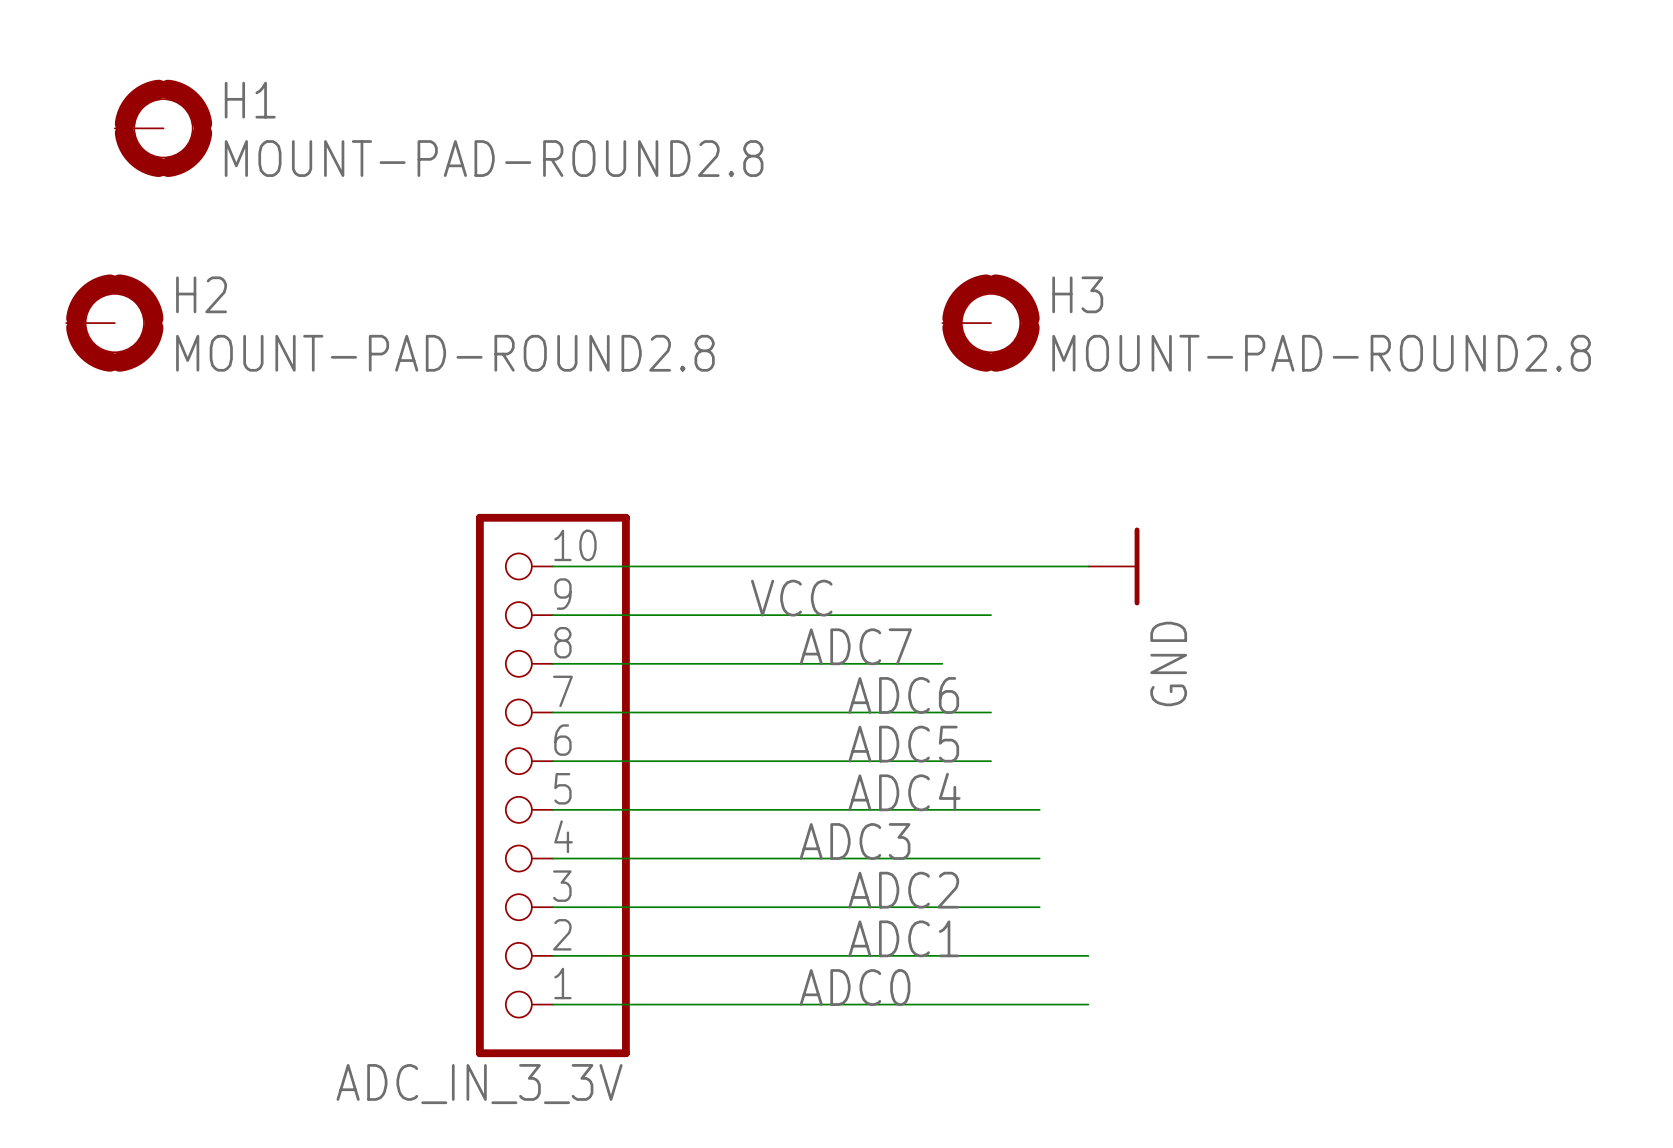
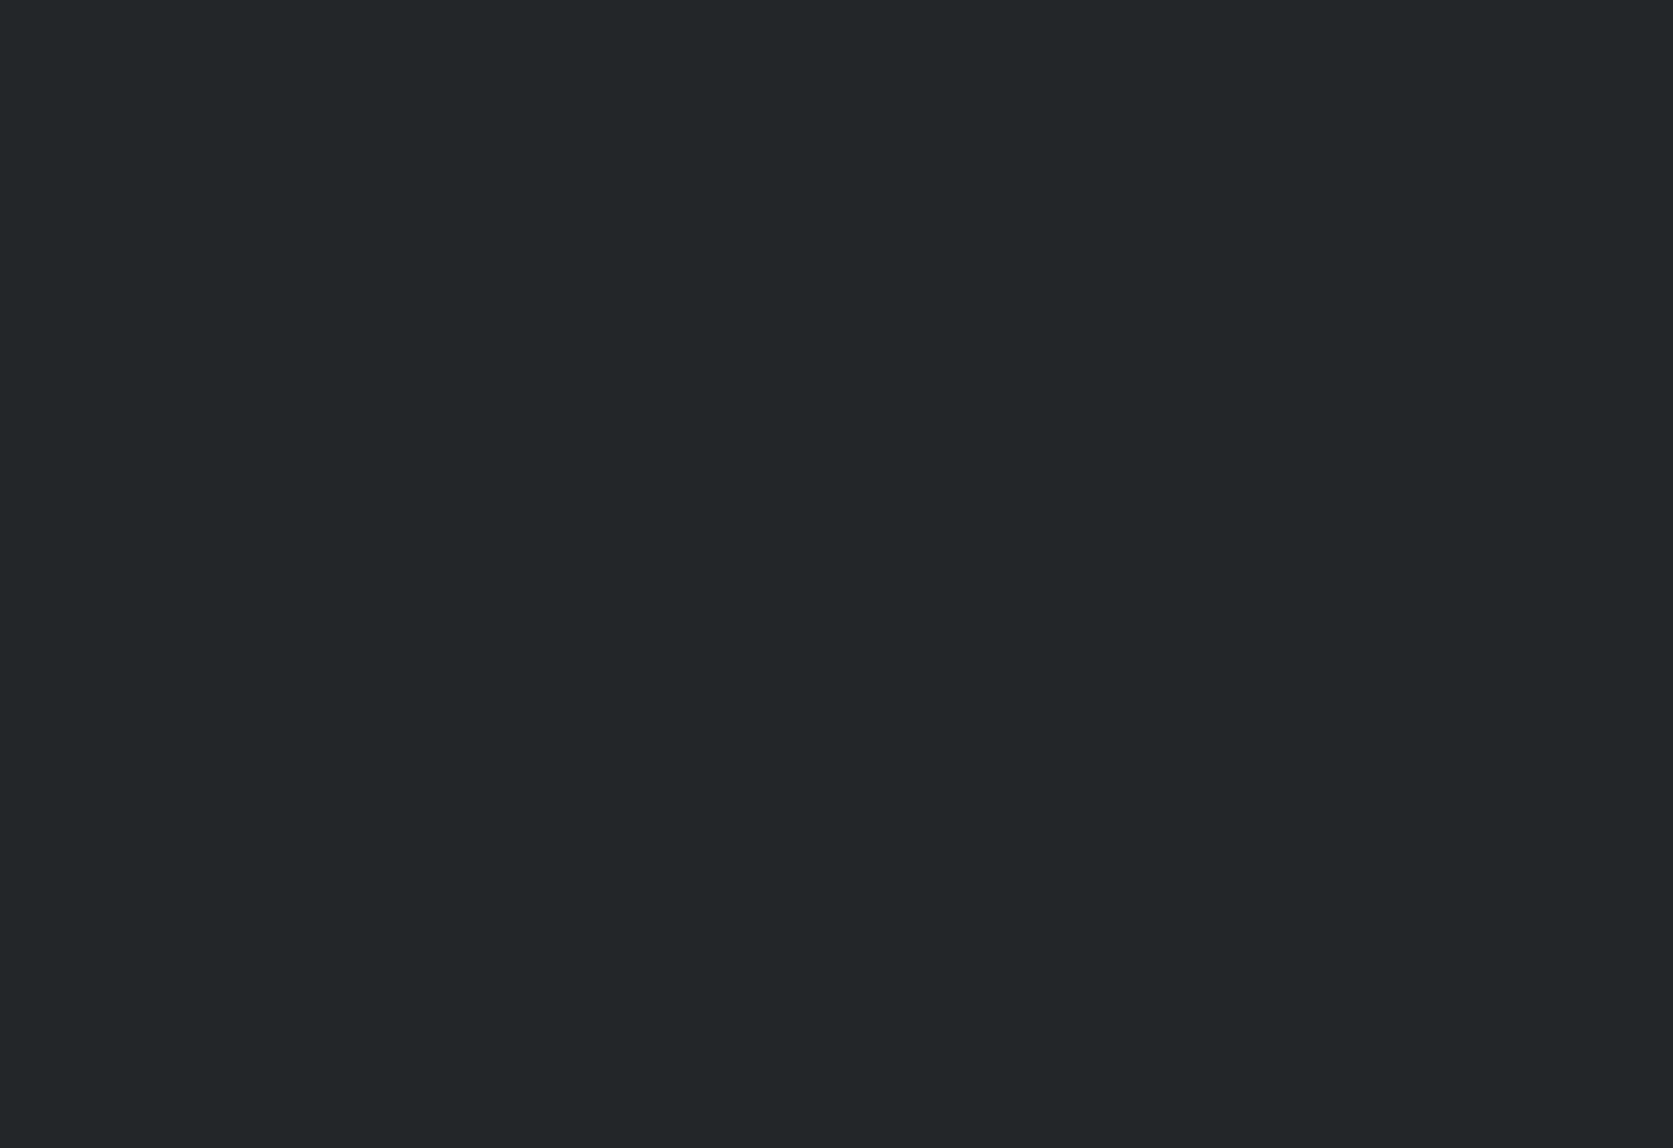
H1: MOUNT-PAD-ROUND2.8 (163, 128) -> none
H2: MOUNT-PAD-ROUND2.8 (114, 323) -> none
H3: MOUNT-PAD-ROUND2.8 (991, 323) -> none
wire: (552, 566) (1088, 566) -> none
power symbol: GND (1113, 566) -> none
label: VCC (791, 598) -> none
wire: (552, 615) (991, 615) -> none
label: ADC7 (855, 646) -> none
wire: (552, 663) (942, 663) -> none
label: ADC6 (903, 695) -> none
wire: (552, 712) (991, 712) -> none
label: ADC5 (903, 744) -> none
wire: (552, 761) (991, 761) -> none
ADC_IN_3_3V: (552, 785) -> none
label: ADC4 (904, 792) -> none
wire: (552, 809) (1039, 809) -> none
label: ADC3 (855, 841) -> none
wire: (552, 858) (1039, 858) -> none
label: ADC2 (903, 890) -> none
wire: (552, 907) (1039, 907) -> none
label: ADC1 (903, 938) -> none
wire: (552, 955) (1088, 955) -> none
label: ADC0 (855, 987) -> none
wire: (552, 1004) (1088, 1004) -> none

